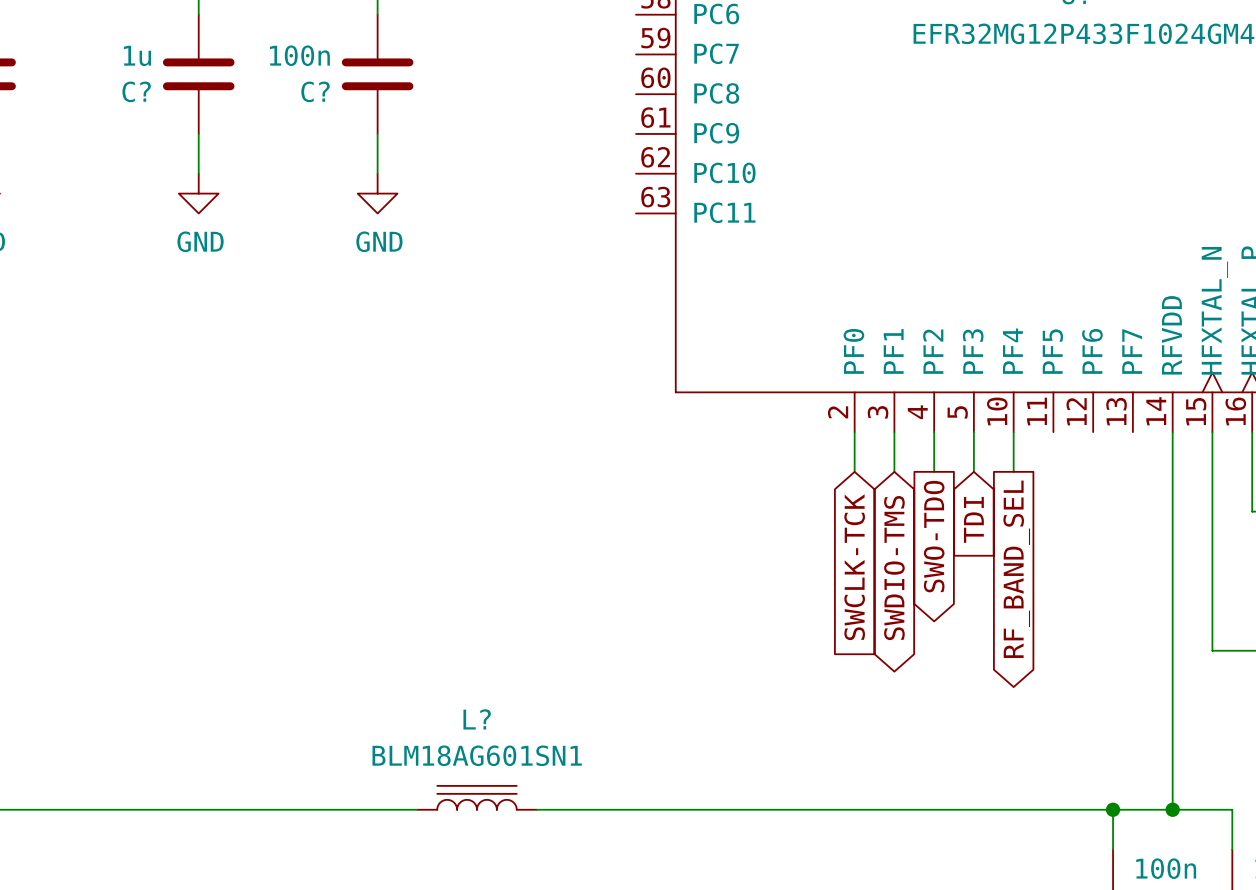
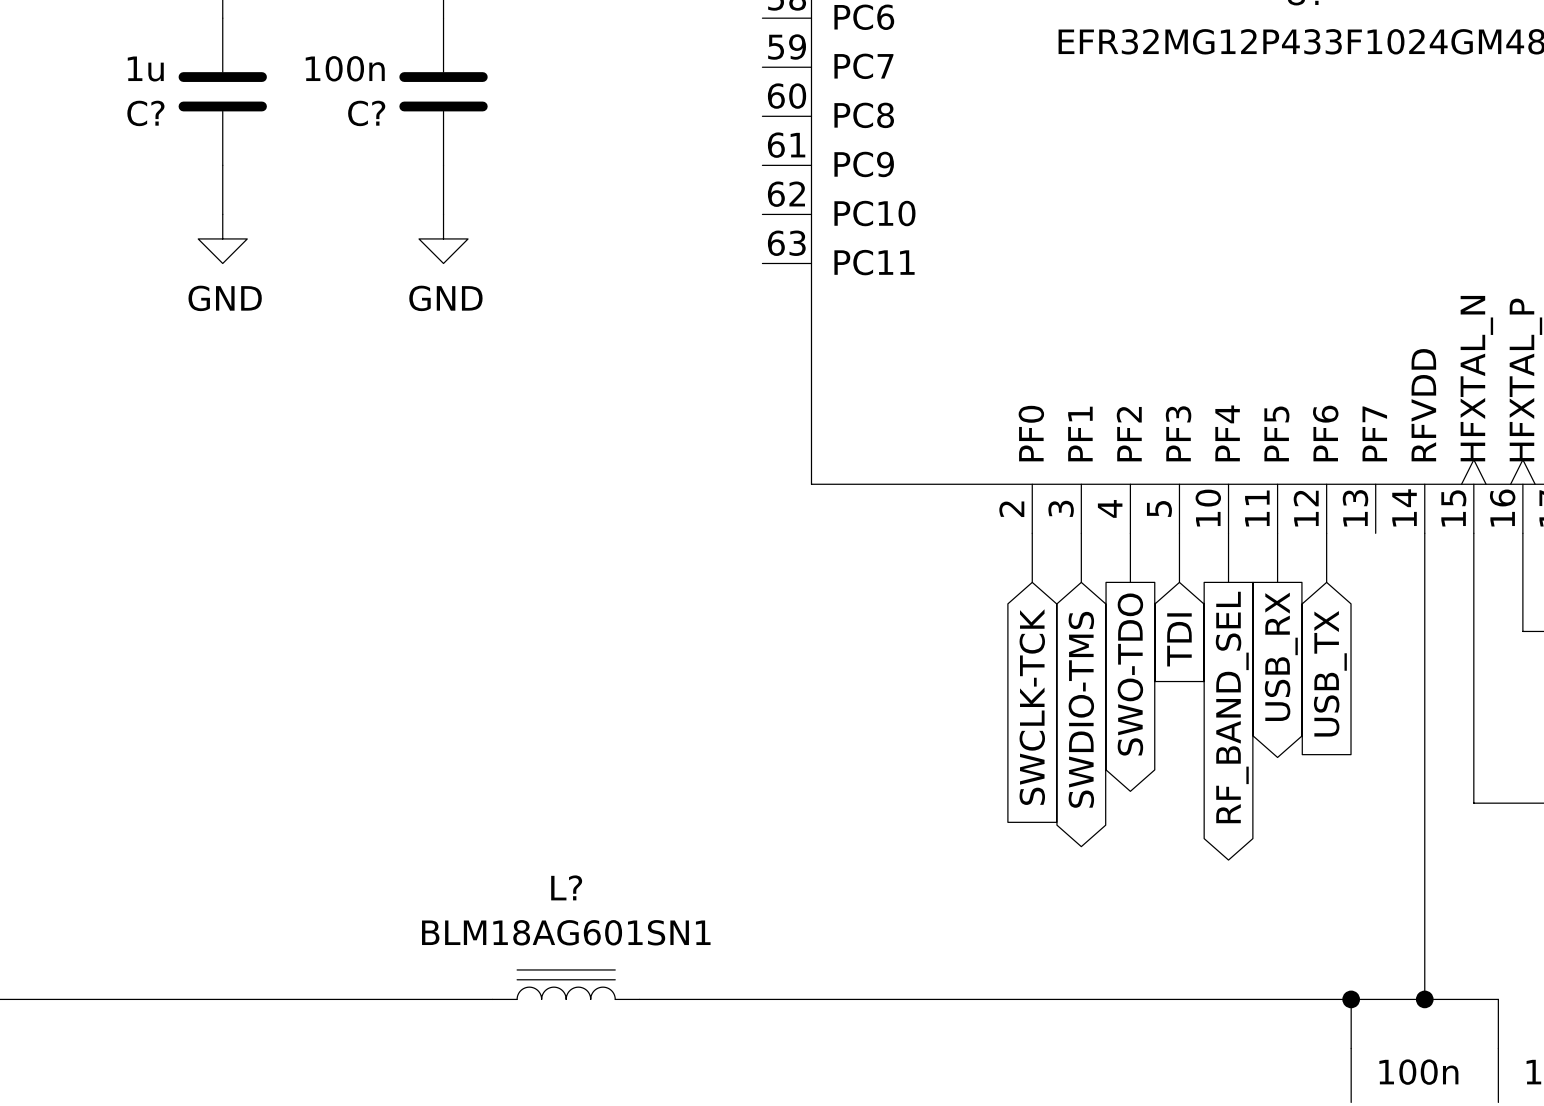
wire: none -> (1277, 533) (1277, 582)
wire: none -> (1326, 533) (1326, 582)
global label: none -> USB_RX (1281, 656)
global label: none -> USB_TX (1330, 673)

